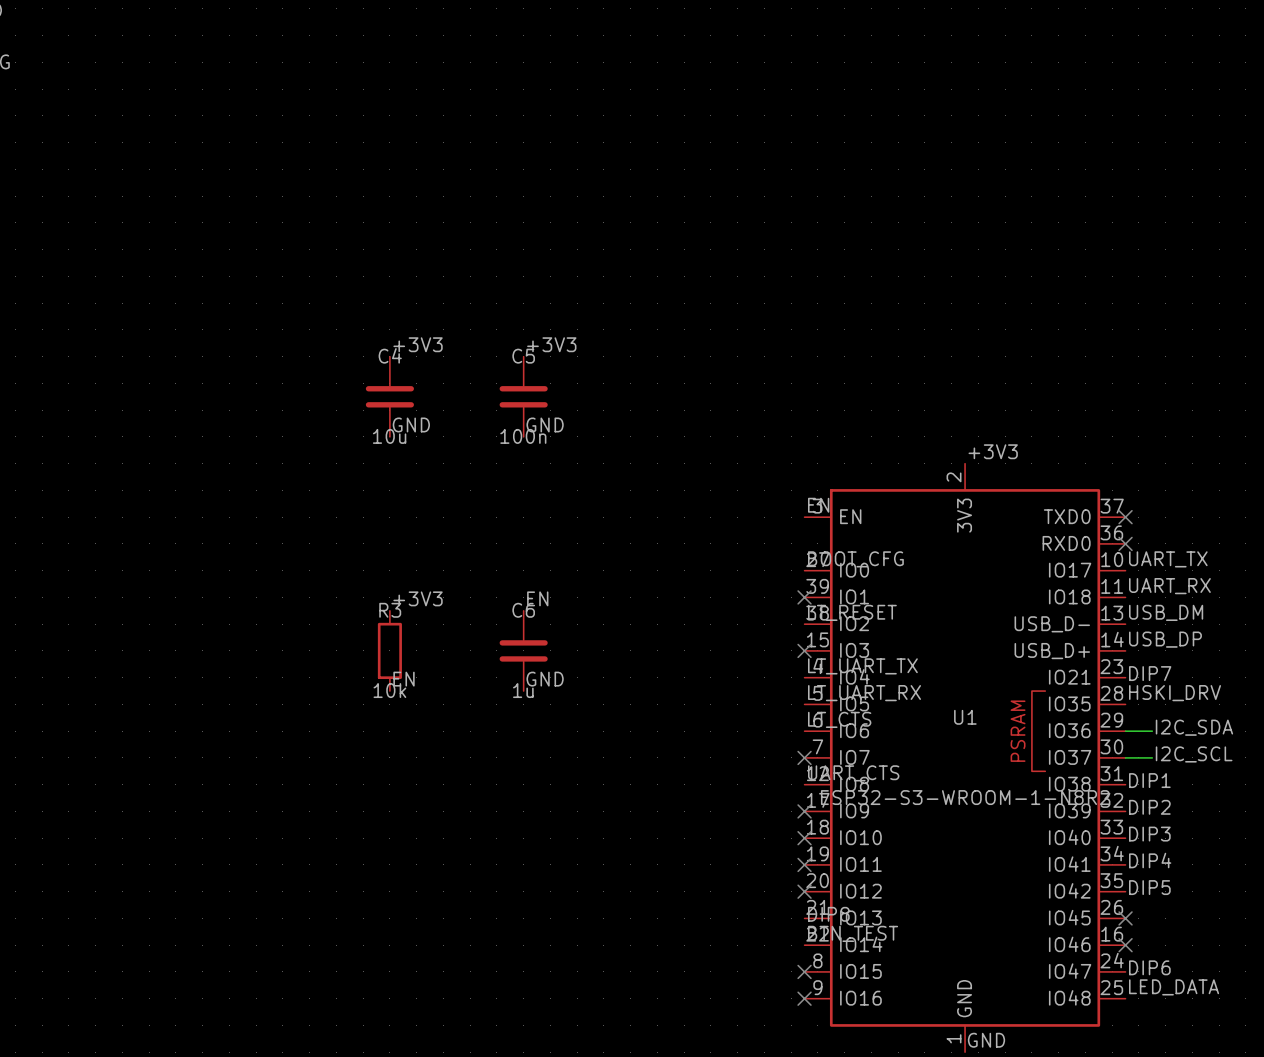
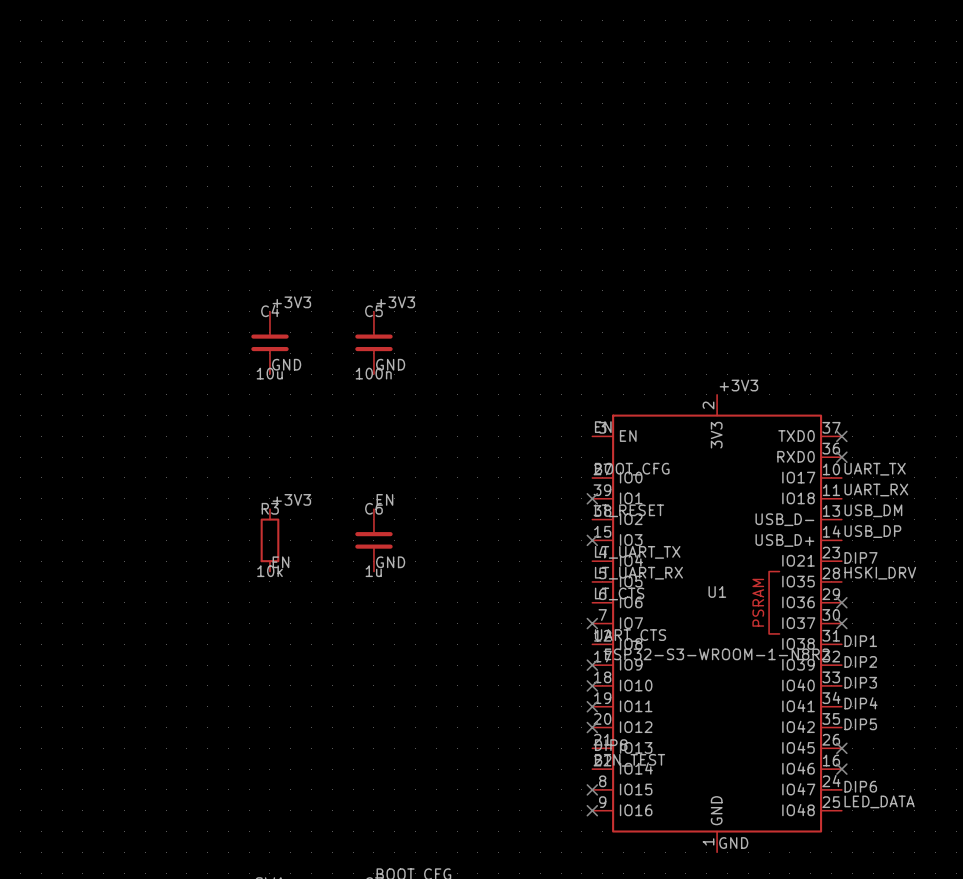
label: I2C_SDA (1194, 727) -> none
wire: (1125, 731) (1152, 731) -> none
no-connect mark: none -> (841, 602)
label: I2C_SCL (1194, 754) -> none
wire: (1125, 757) (1152, 757) -> none
no-connect mark: none -> (841, 623)

